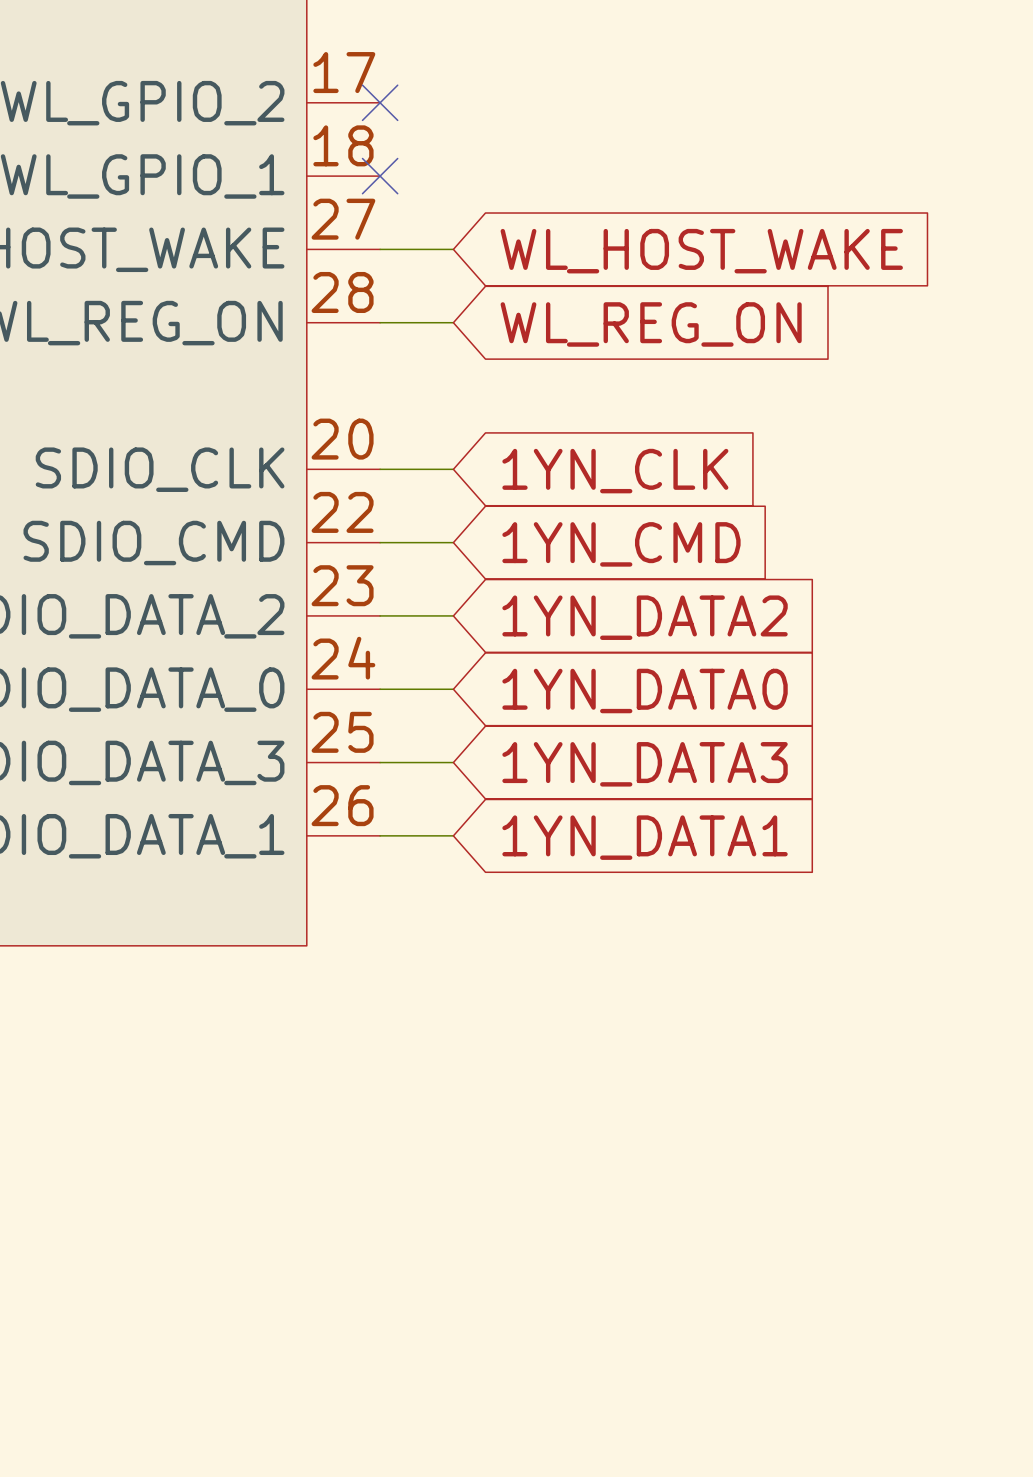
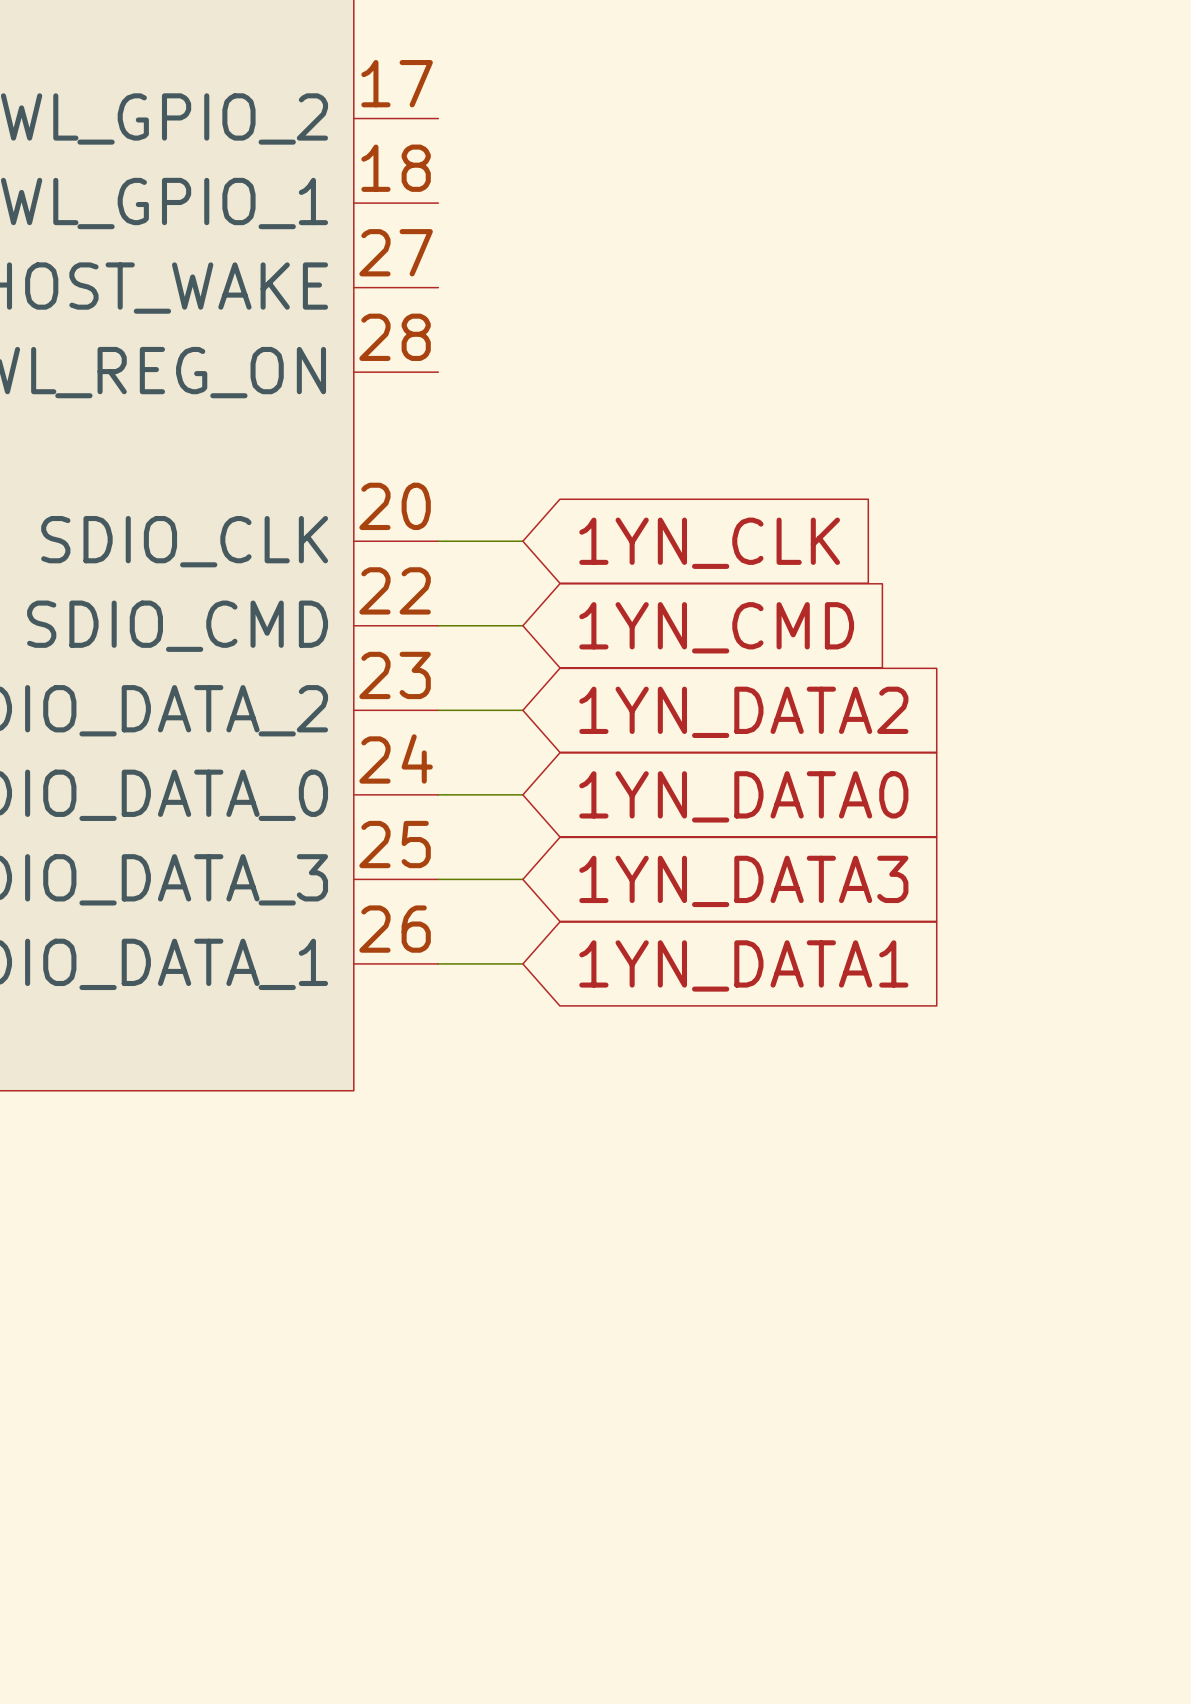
no-connect mark: (380, 102) -> none
no-connect mark: (380, 176) -> none
wire: (380, 249) (453, 249) -> none
global label: WL_HOST_WAKE (701, 251) -> none
wire: (380, 322) (453, 322) -> none
global label: WL_REG_ON (651, 324) -> none

